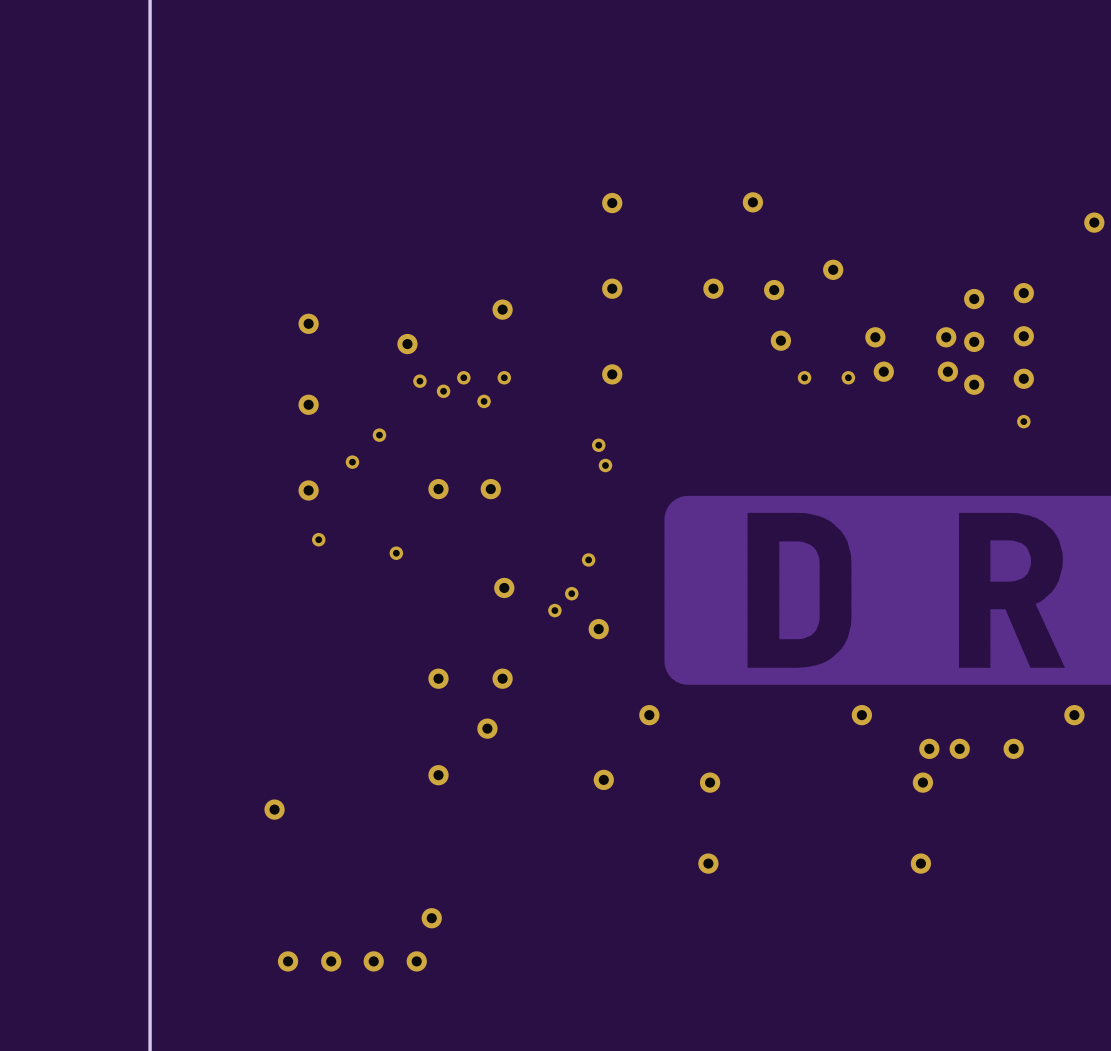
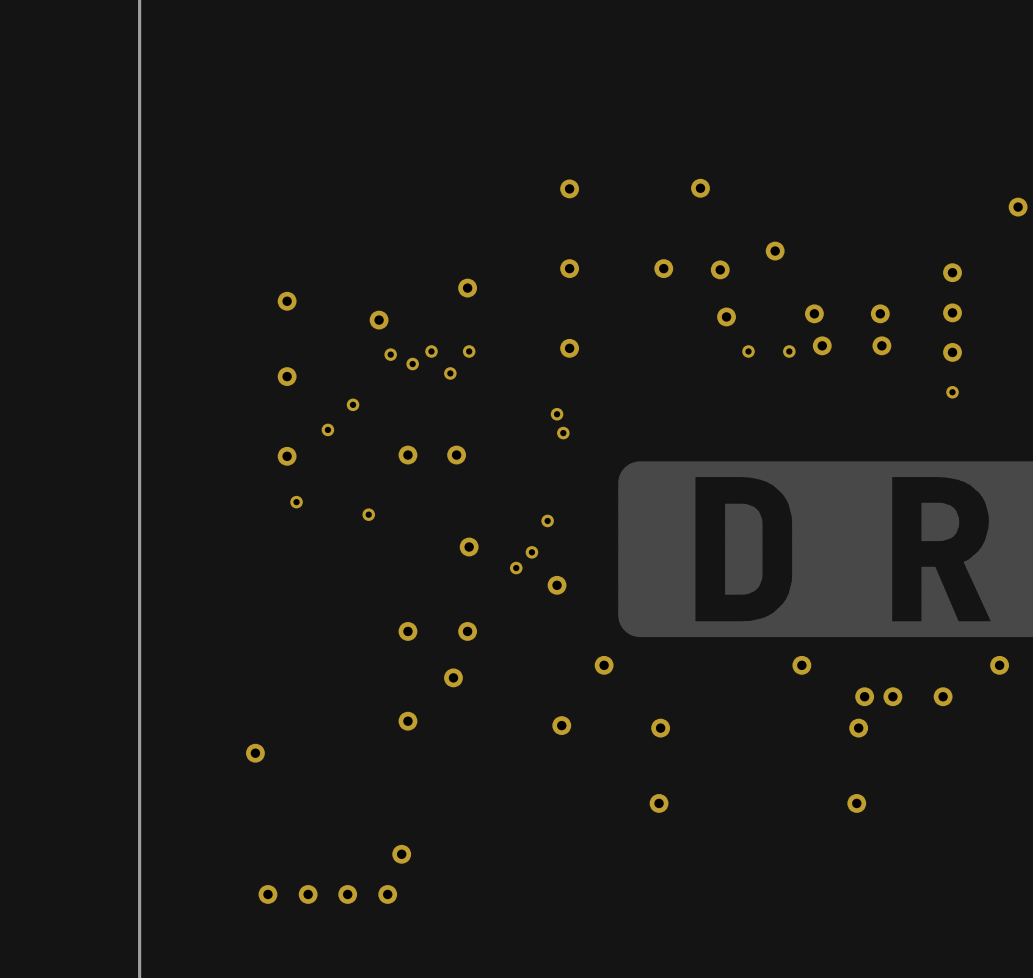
via: (974, 299) -> none
via: (974, 341) -> none
via: (974, 384) -> none

